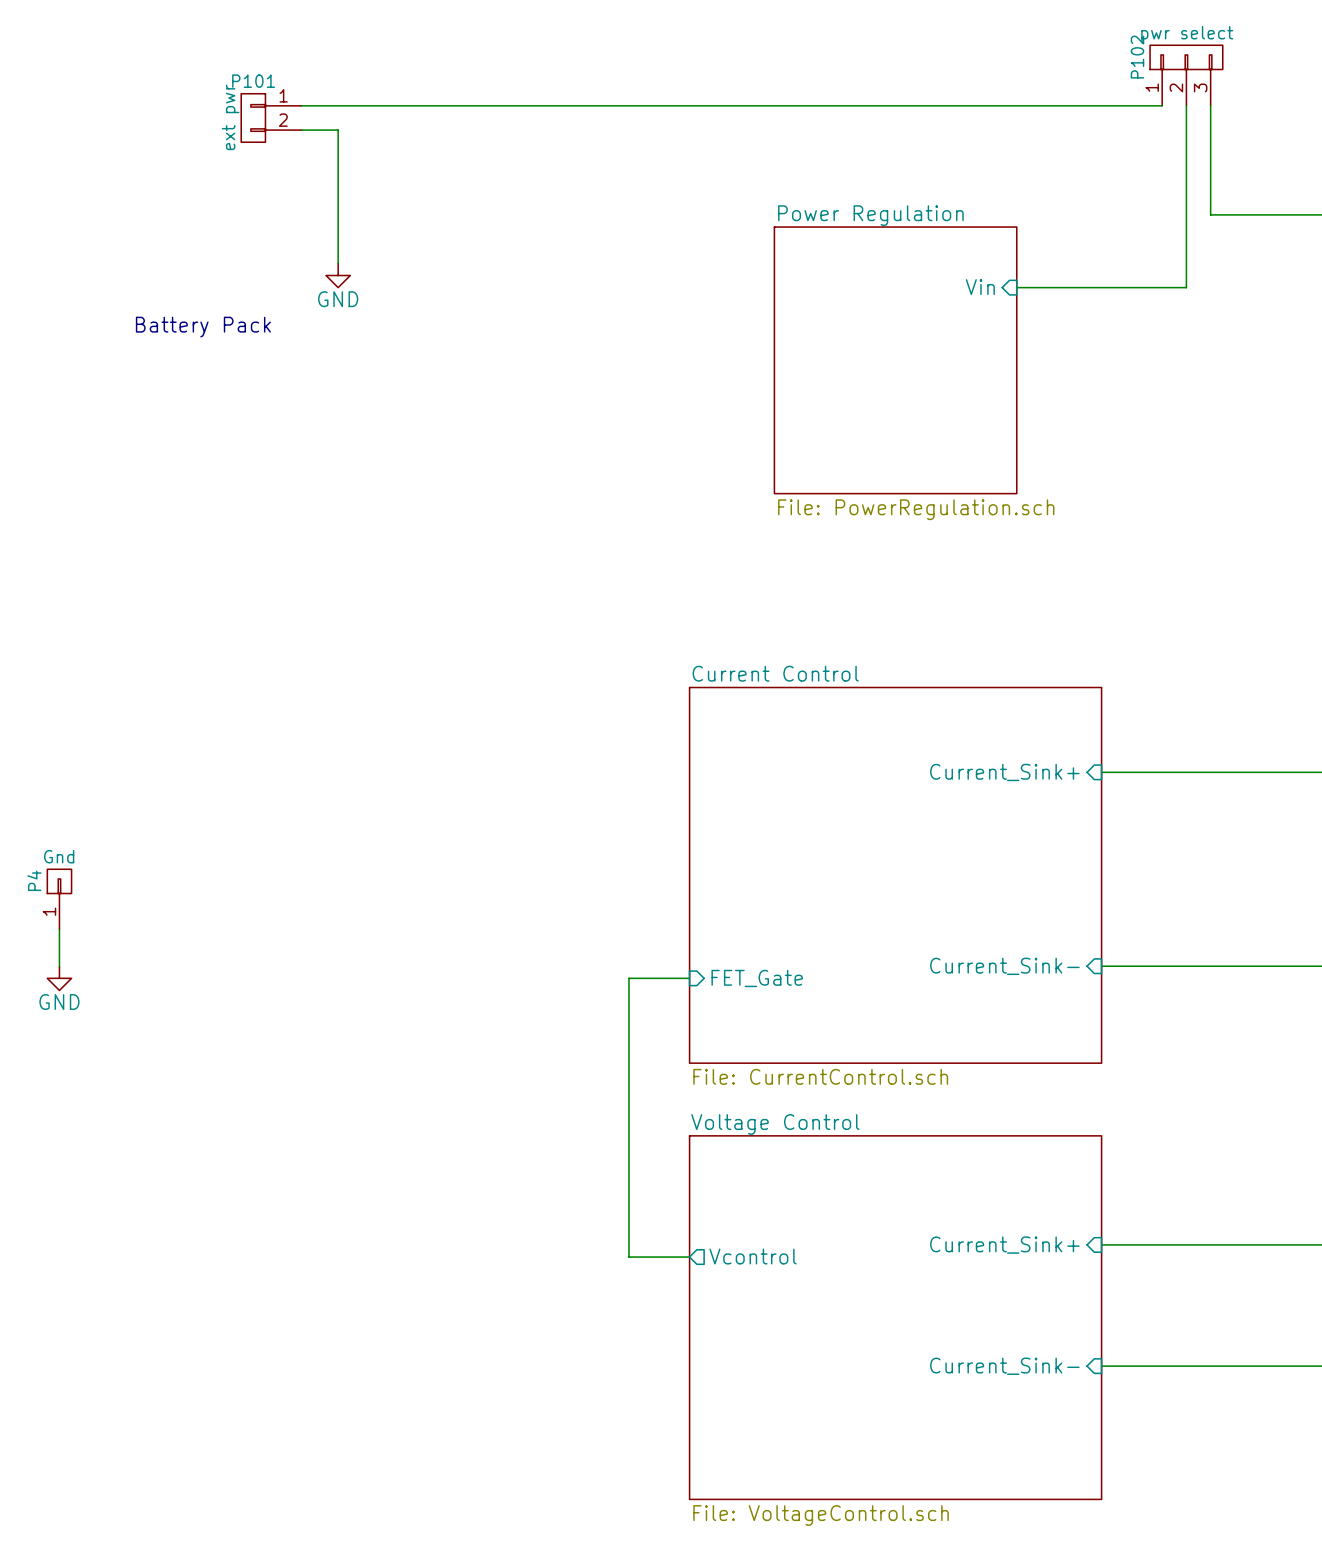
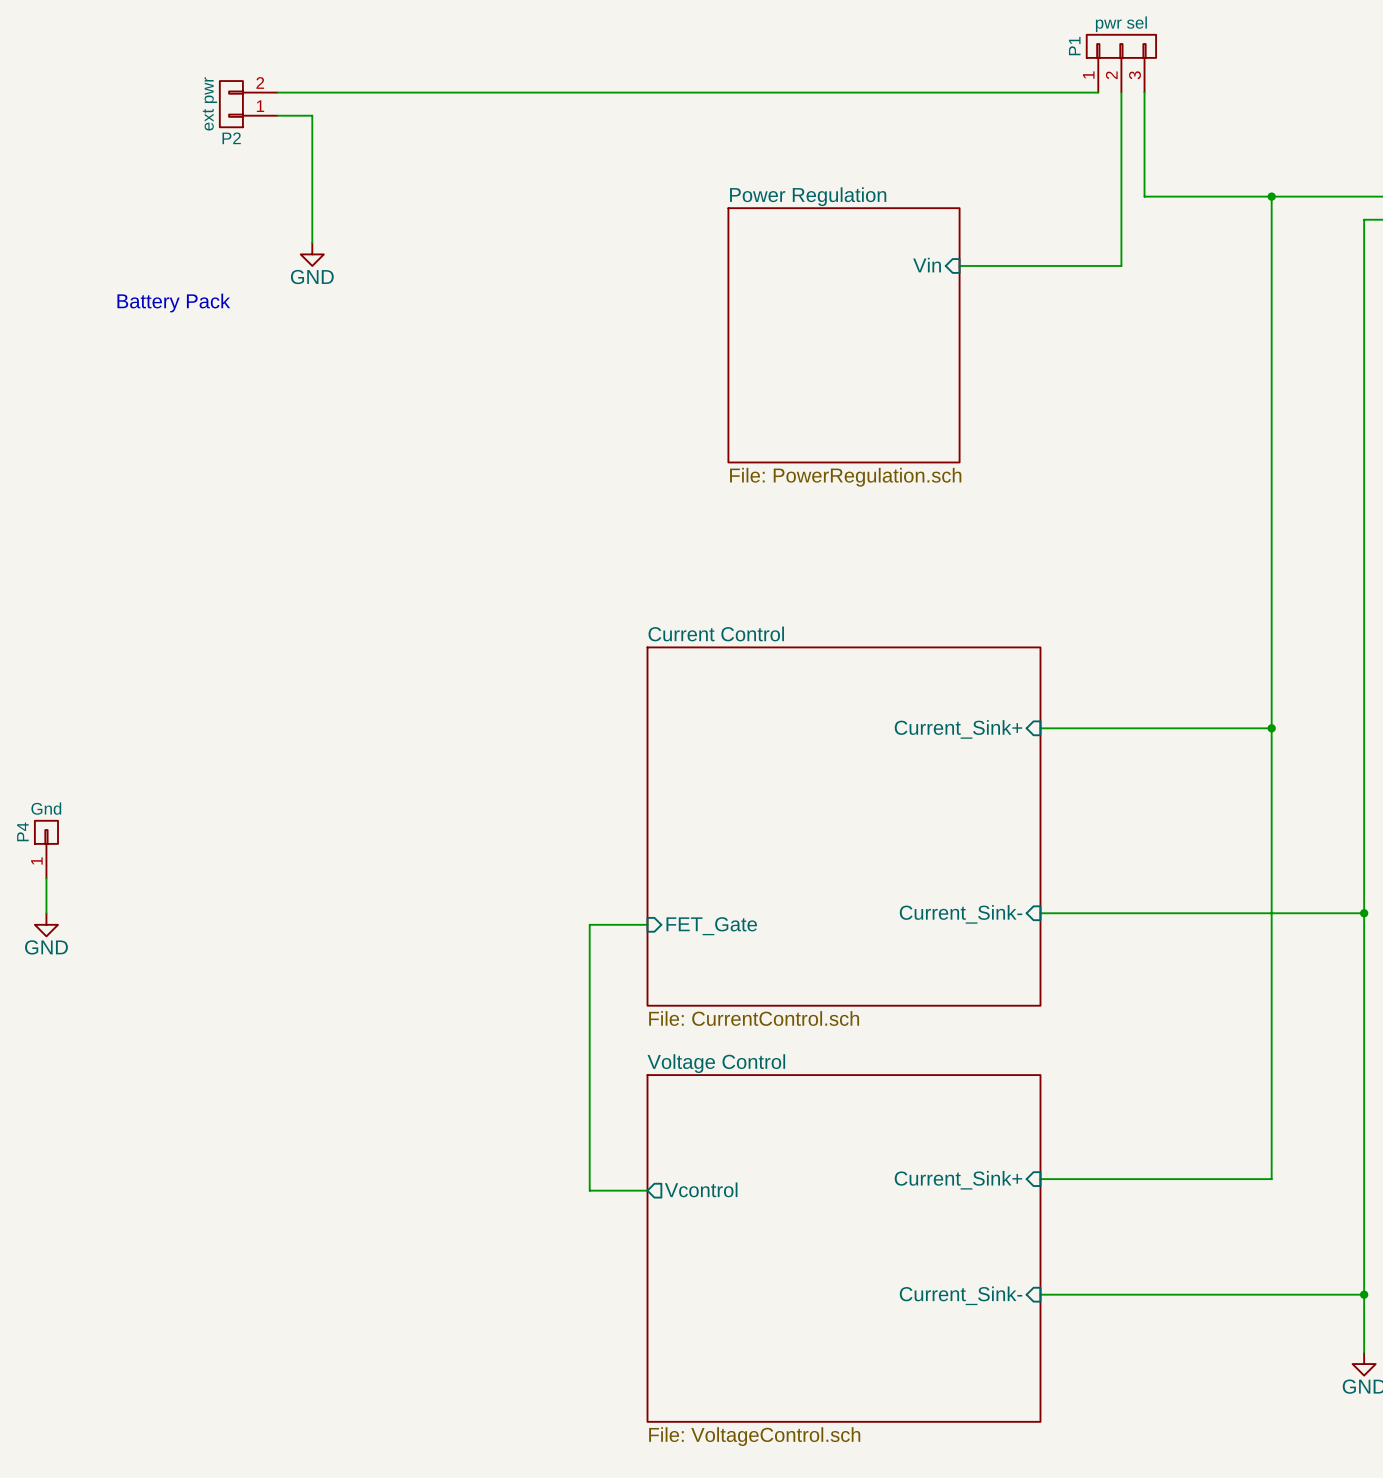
P102 value: pwr select (1187, 34) -> pwr sel (1121, 24)
P102 name: P102 (1137, 57) -> P1 (1074, 46)
P101 name: P101 (253, 81) -> P2 (231, 138)
P101 flip: as is (253, 117) -> up-down (231, 104)

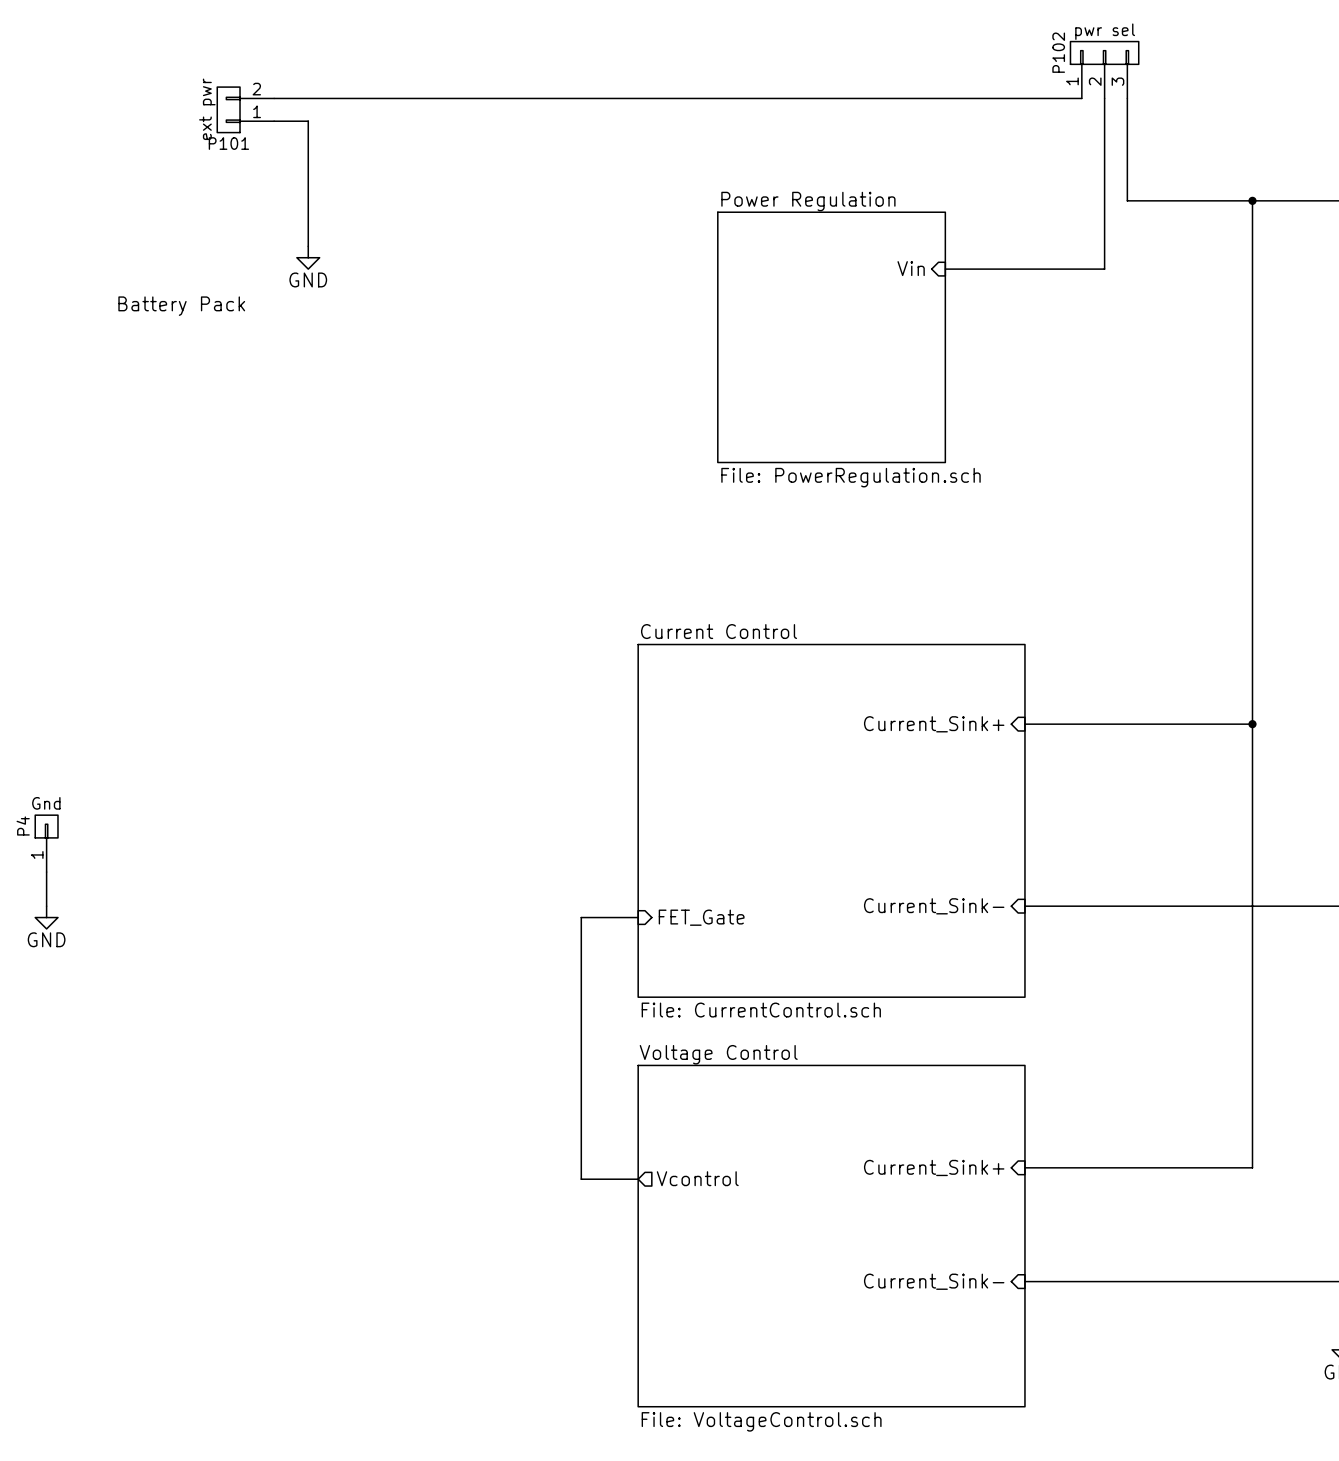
P1 name: P1 (1074, 46) -> P102 (1058, 52)
P2 name: P2 (231, 138) -> P101 (228, 143)

